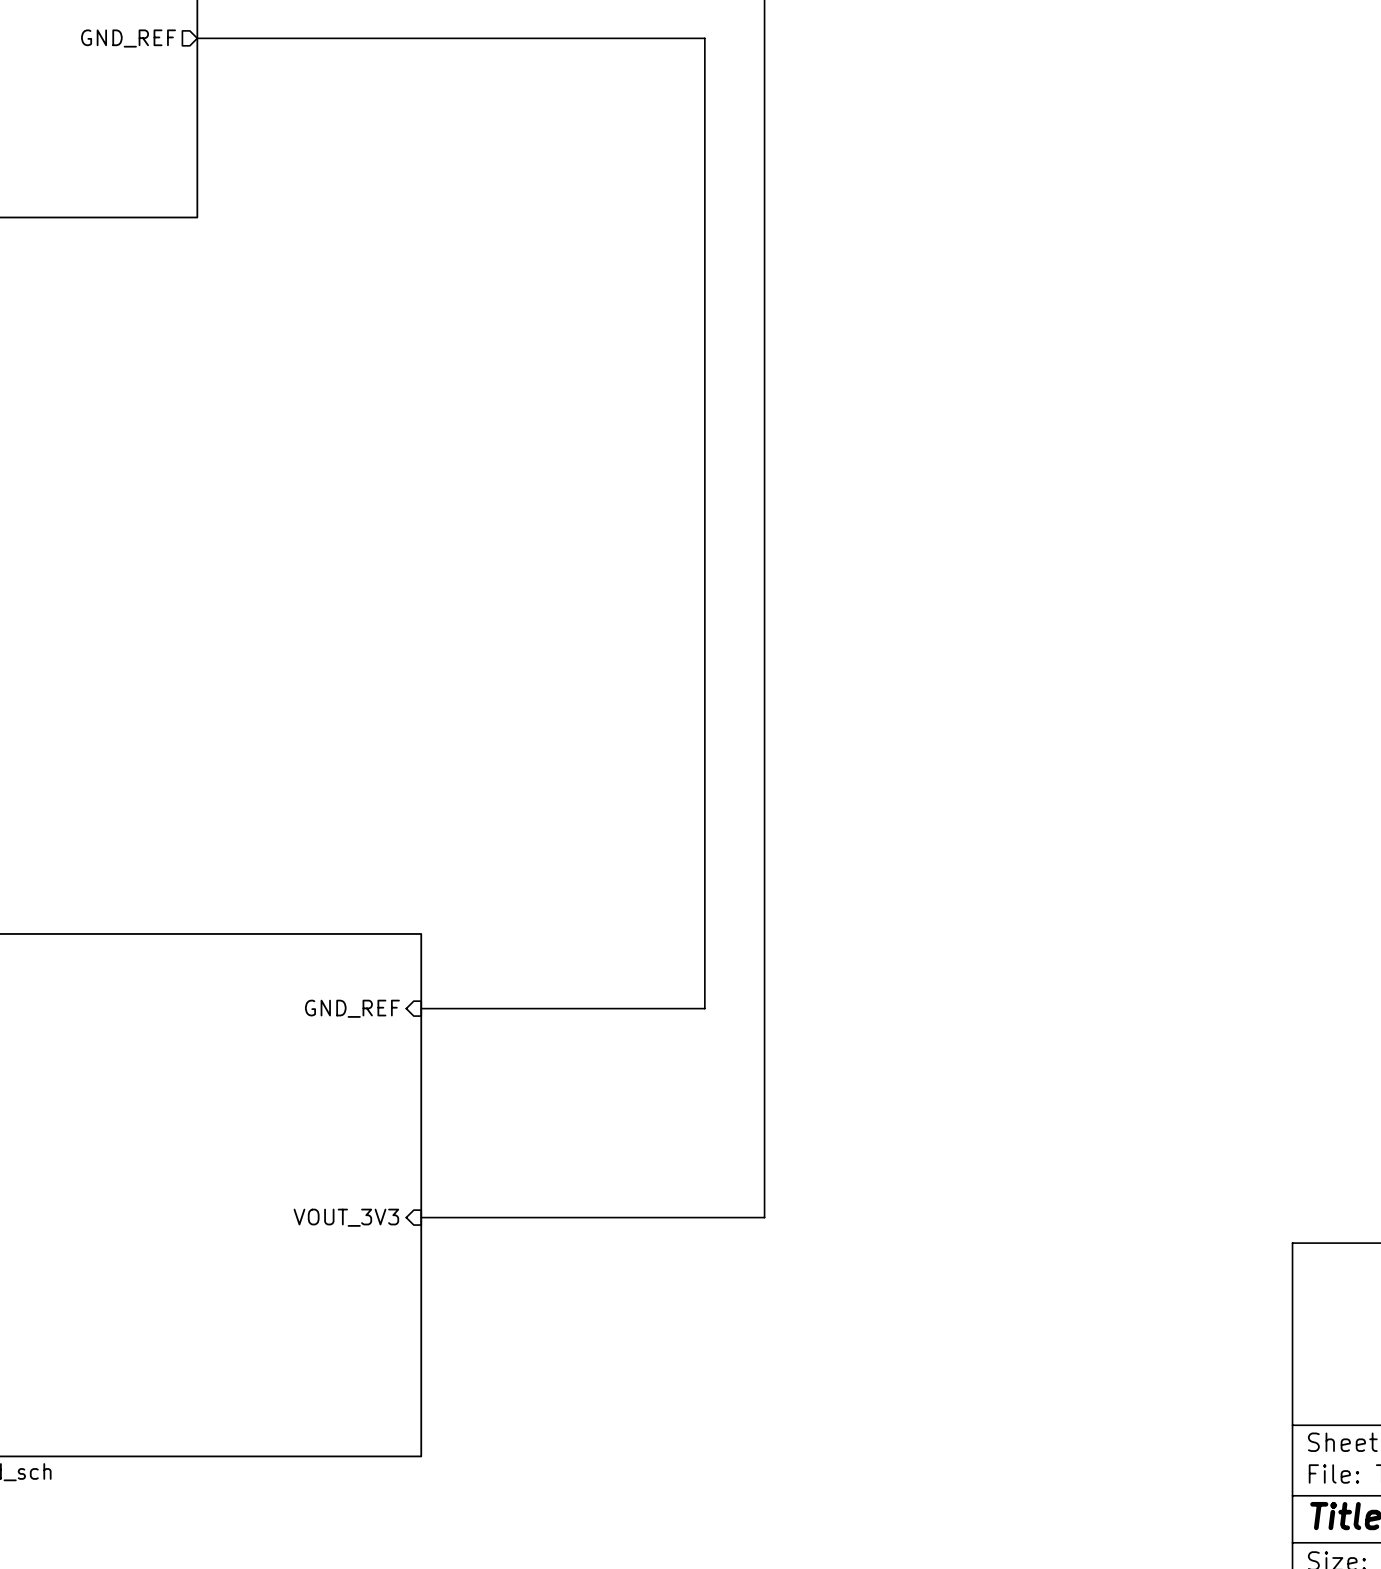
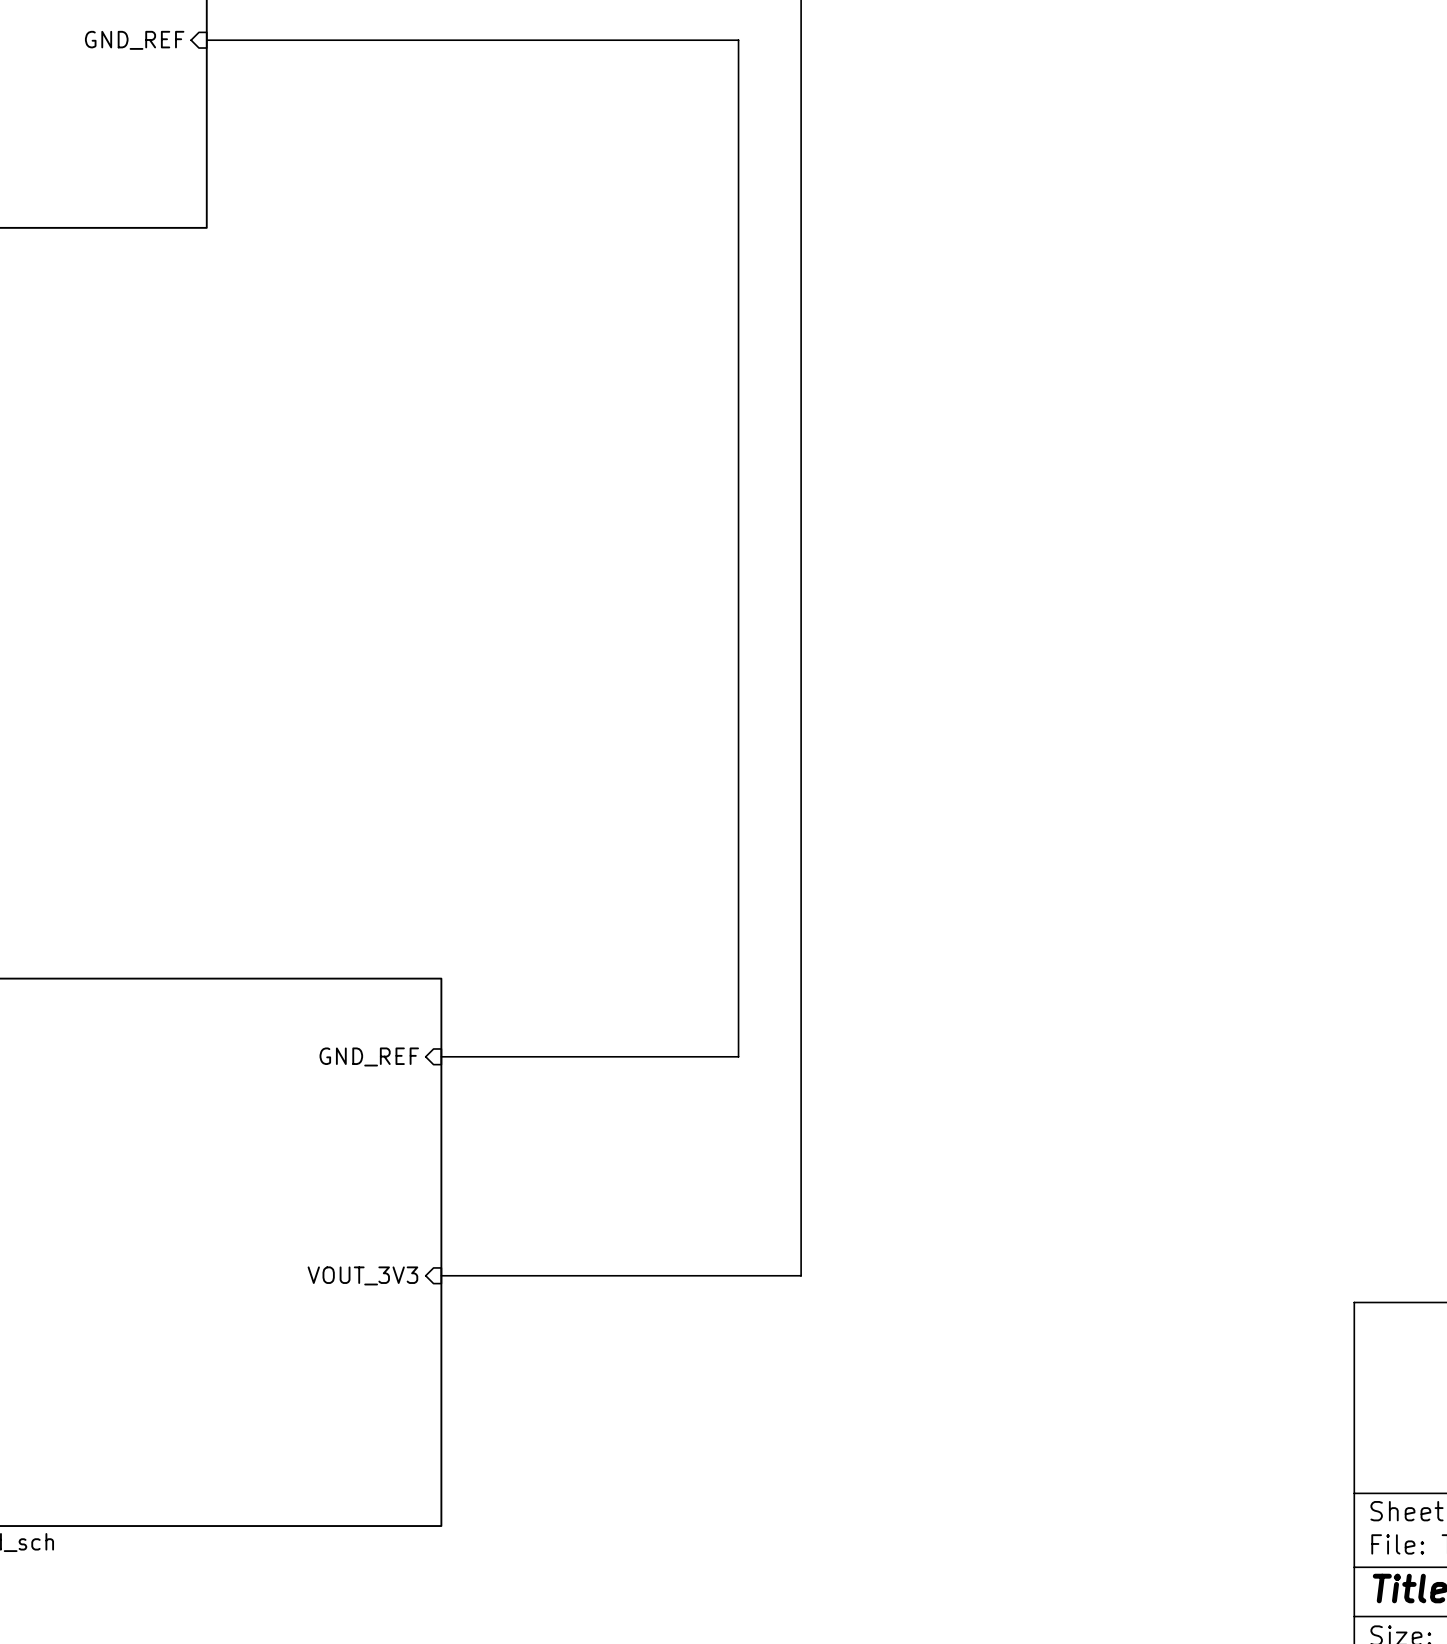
sheet pin shape: output (128, 38) -> input (134, 40)

